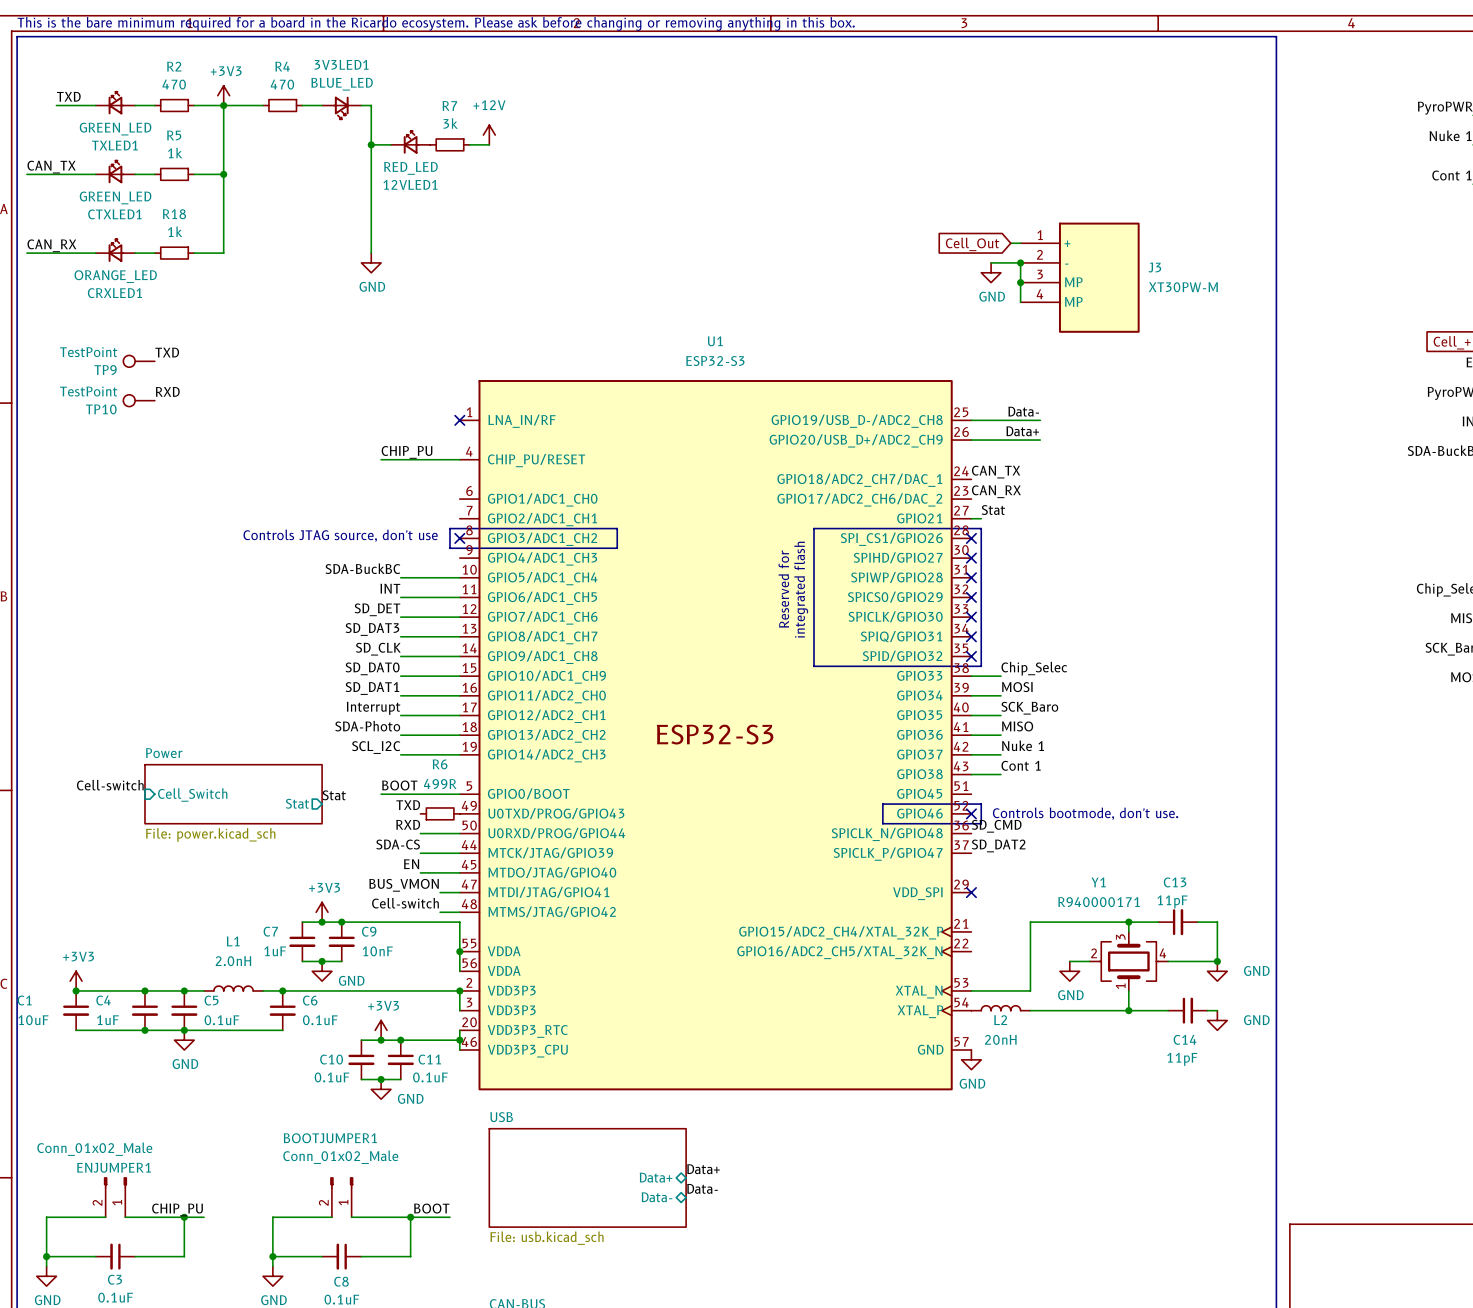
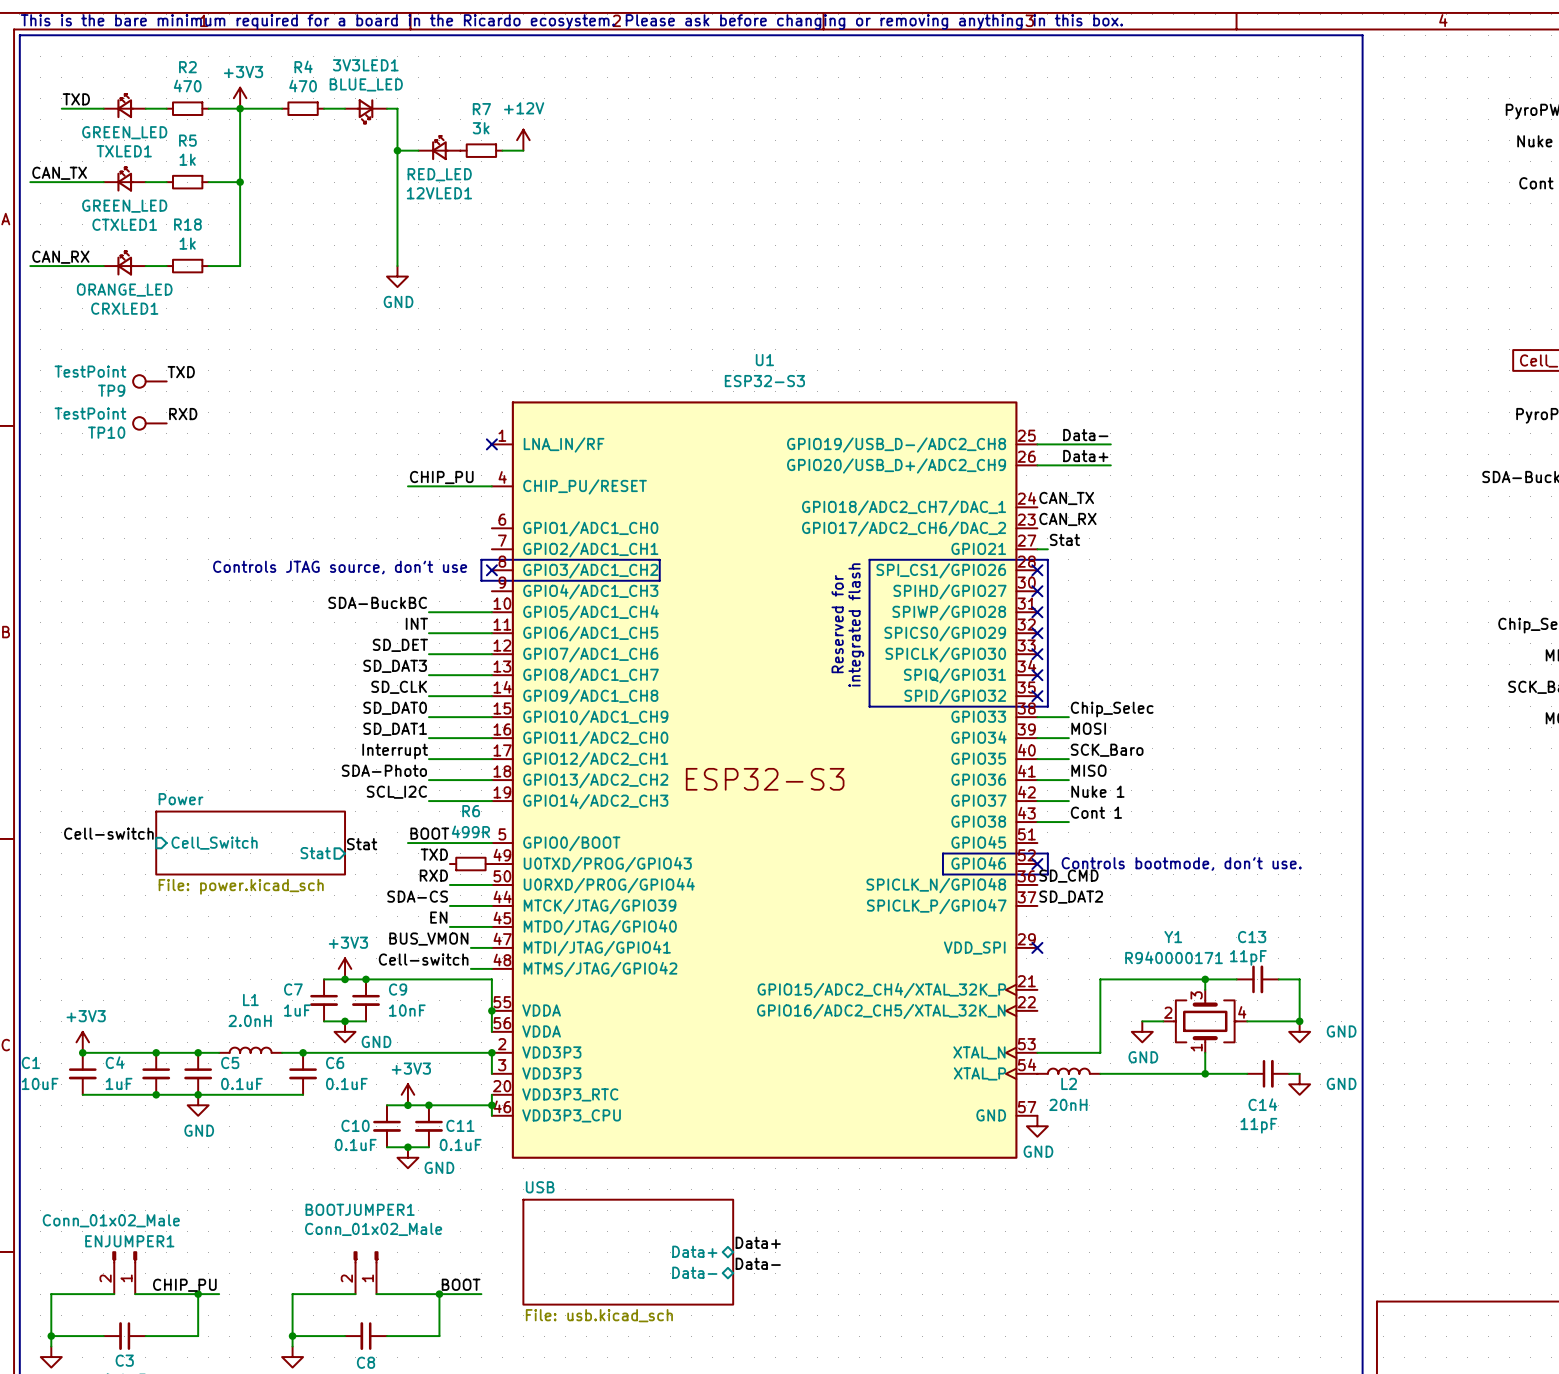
wire: (1010, 243) (1020, 243) -> none
global label: Cell_Out (972, 244) -> none
wire: (991, 262) (1020, 262) (1020, 302) -> none
junction: (1020, 262) -> none
power symbol: GND (991, 272) -> none
J3: XT30PW-M (1080, 277) -> none
junction: (1020, 282) -> none

